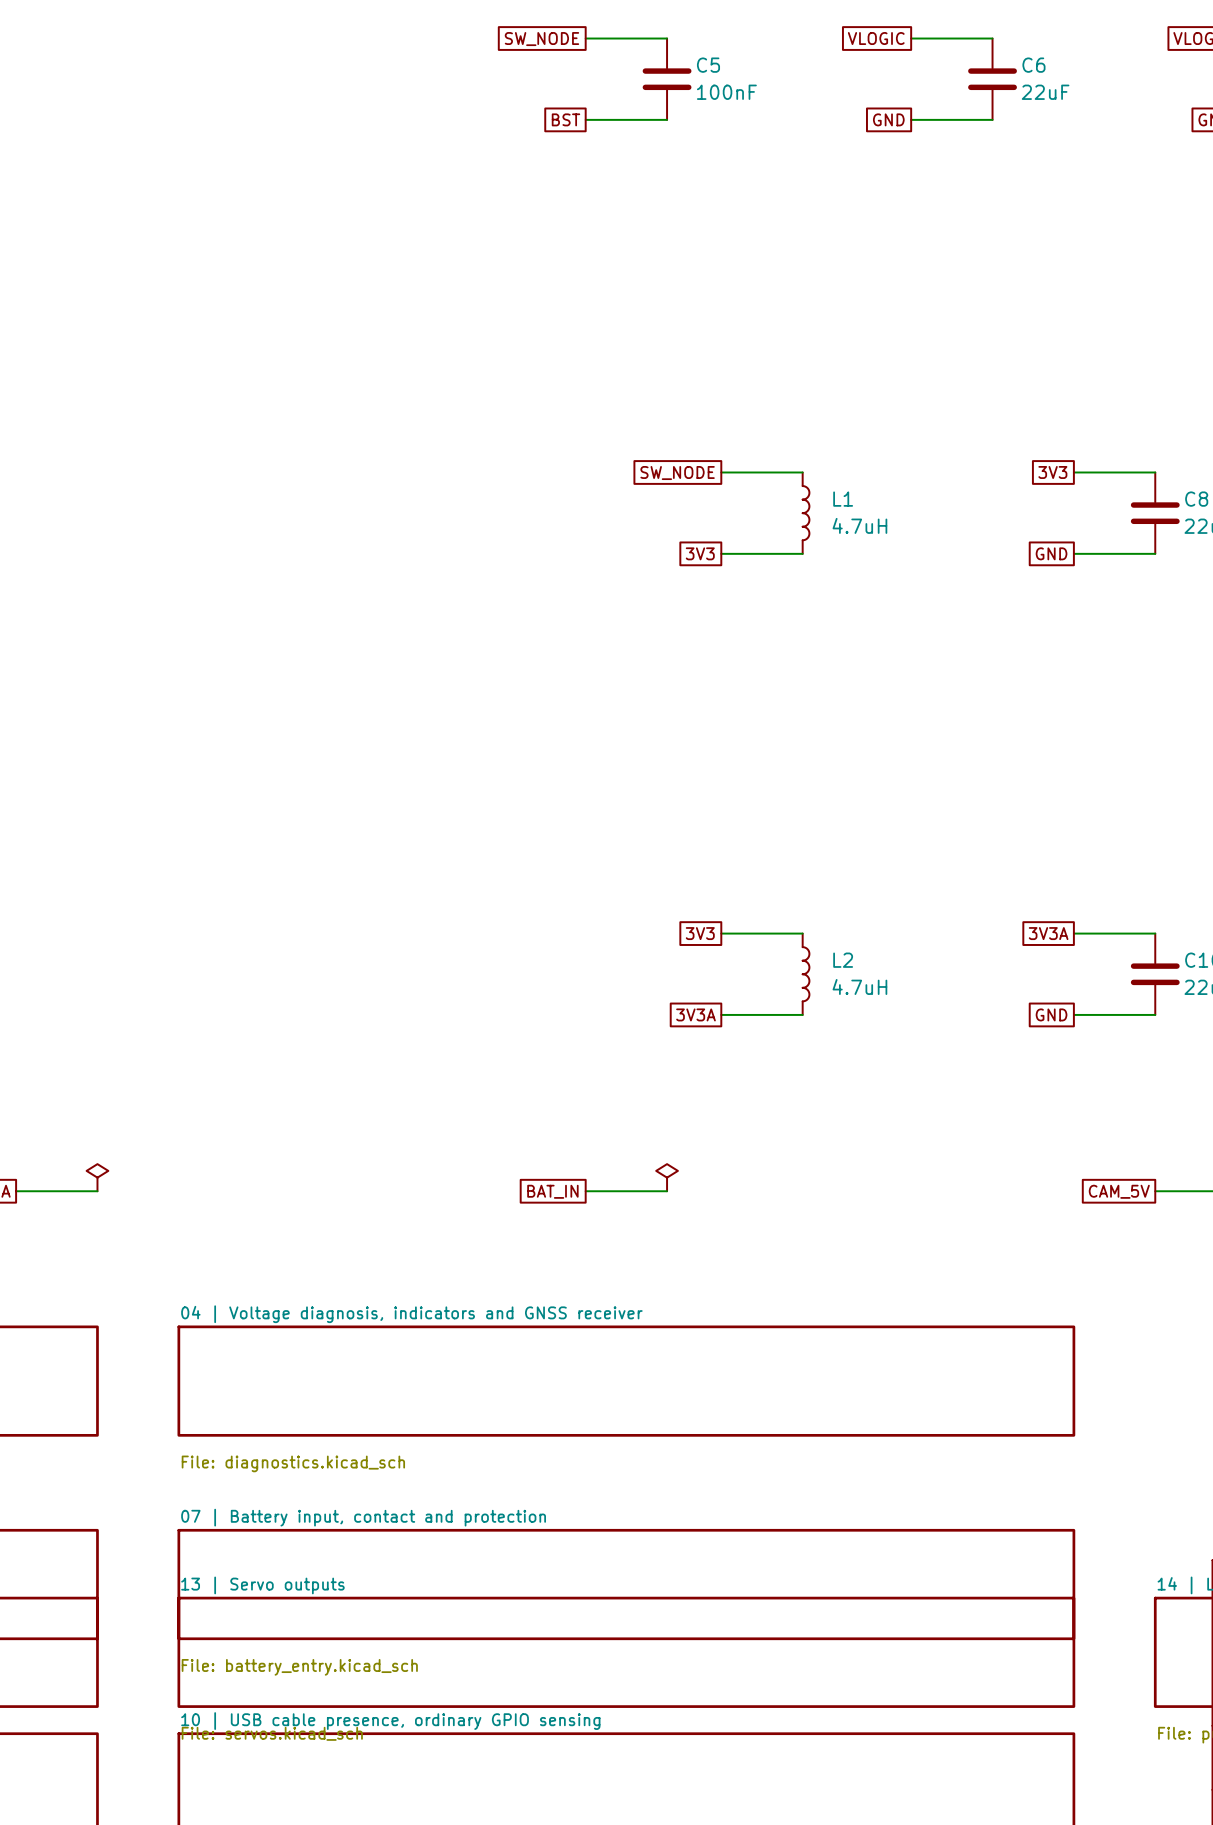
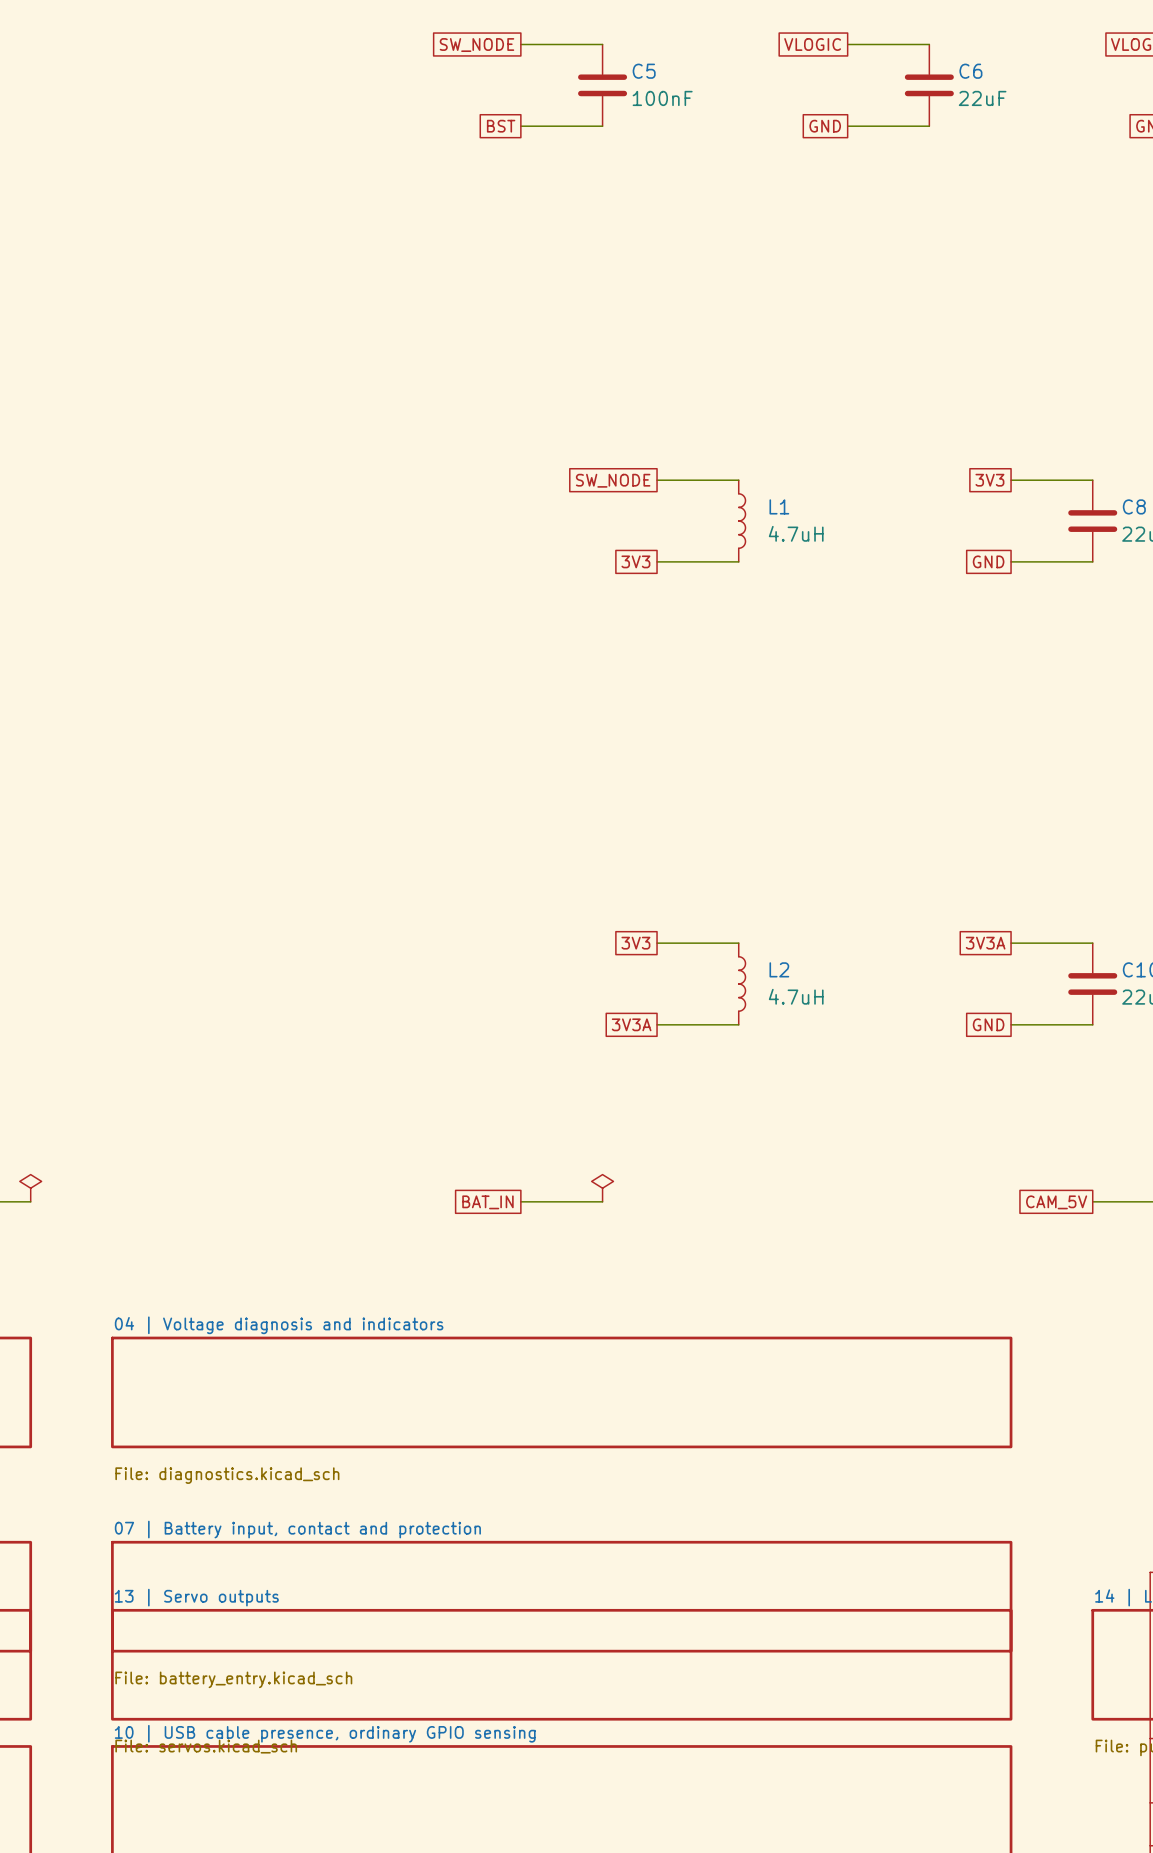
sheet 04 | Voltage diagnosis, indicators and GNSS receiver name: 04 | Voltage diagnosis, indicators and GNSS receiver (411, 1314) -> 04 | Voltage diagnosis and indicators (279, 1325)

